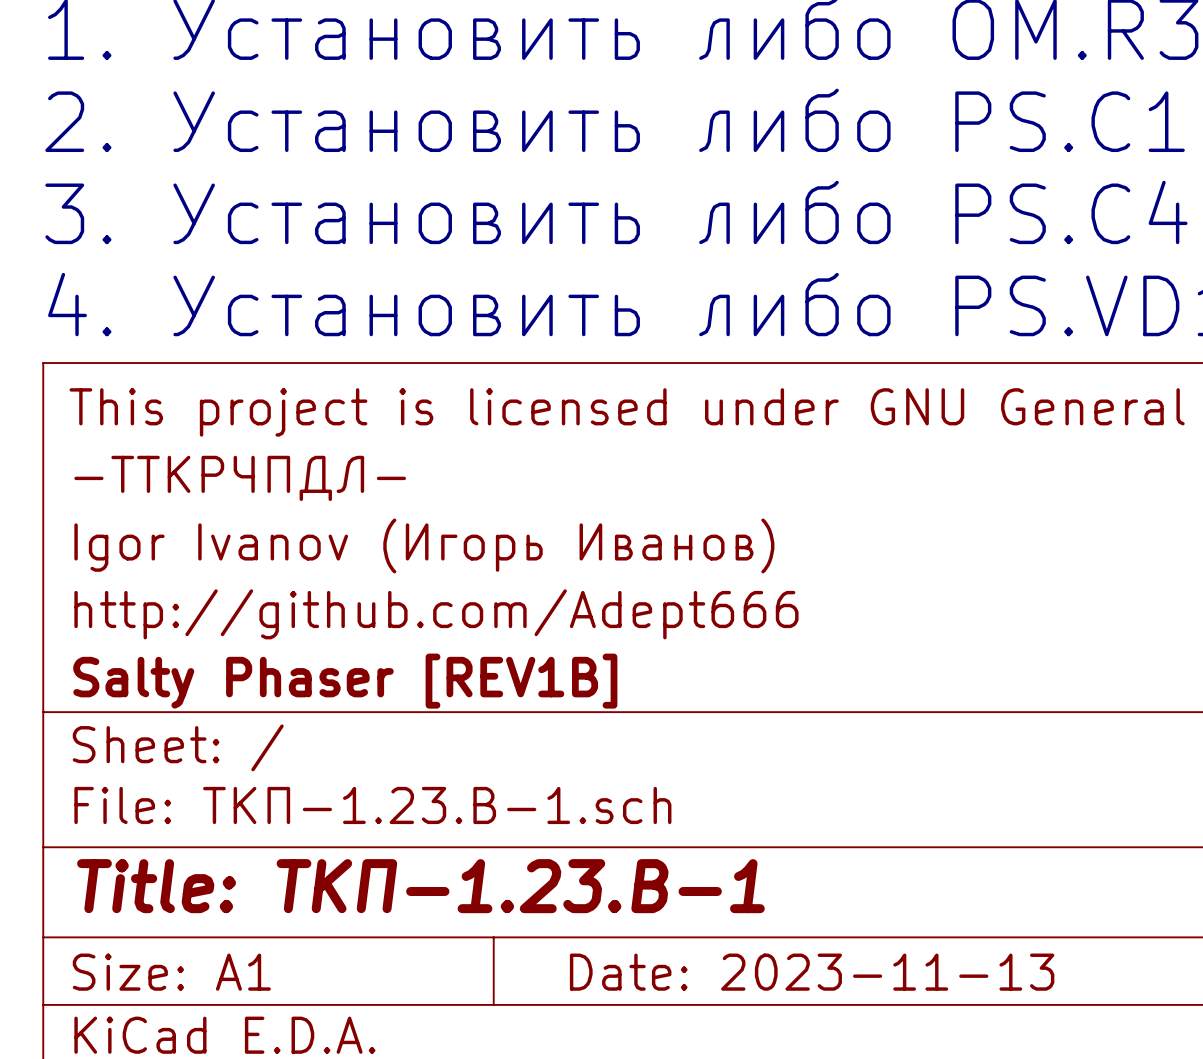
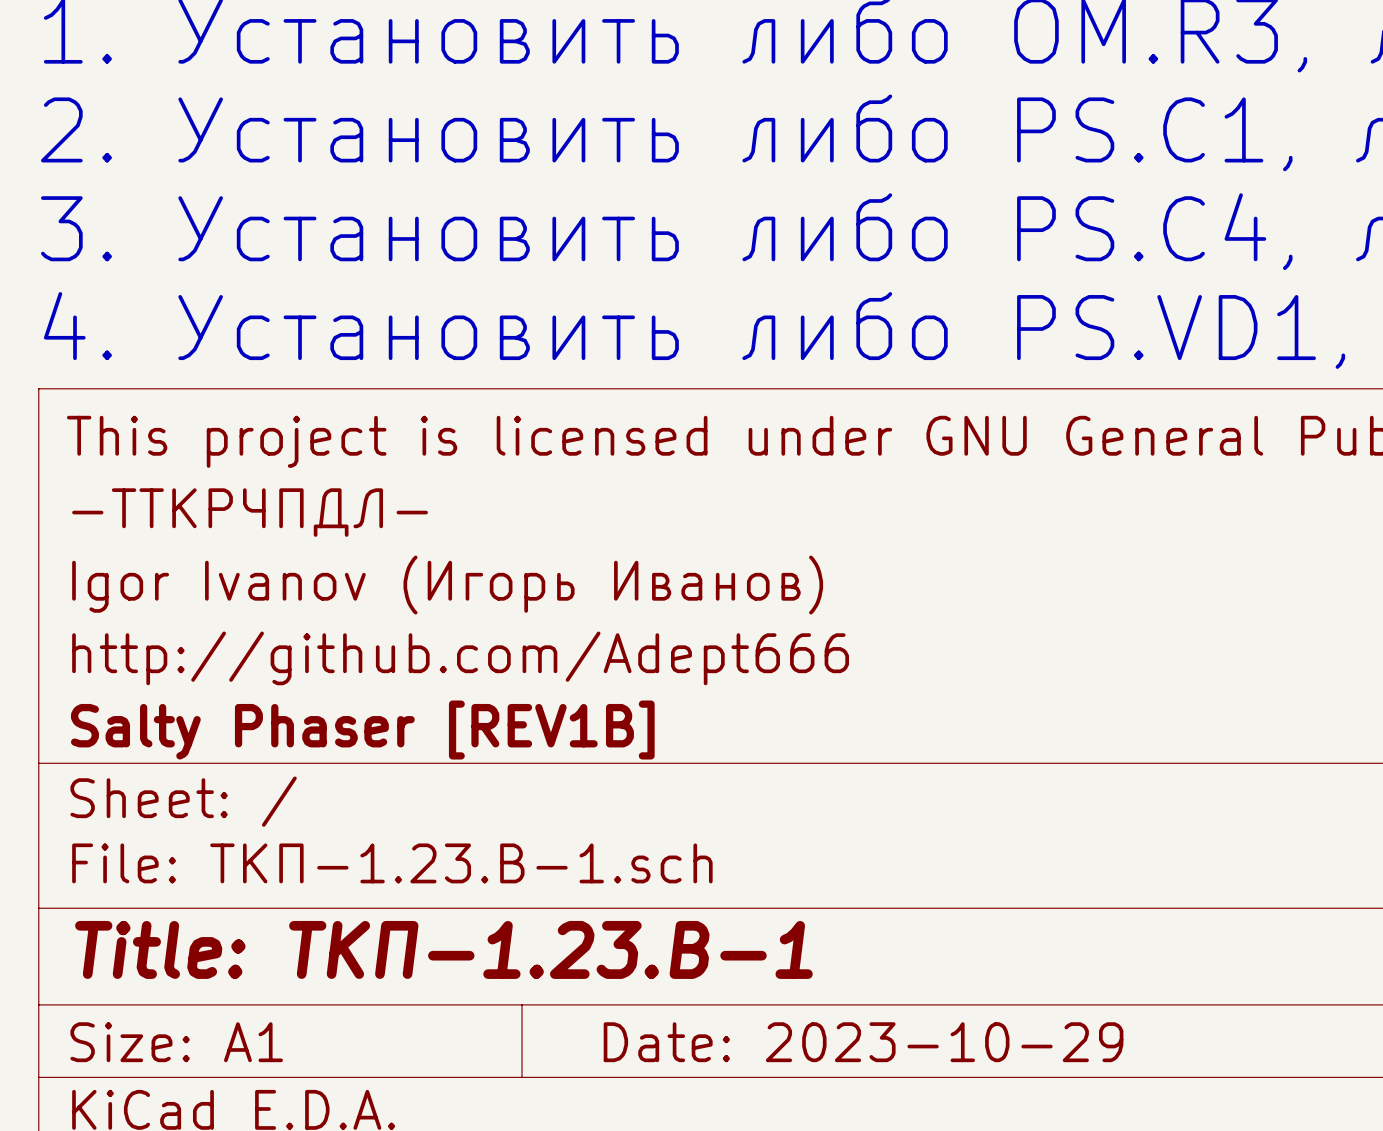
title block: Date: 2023-11-13 (812, 972) -> Date: 2023-10-29 (863, 1042)

